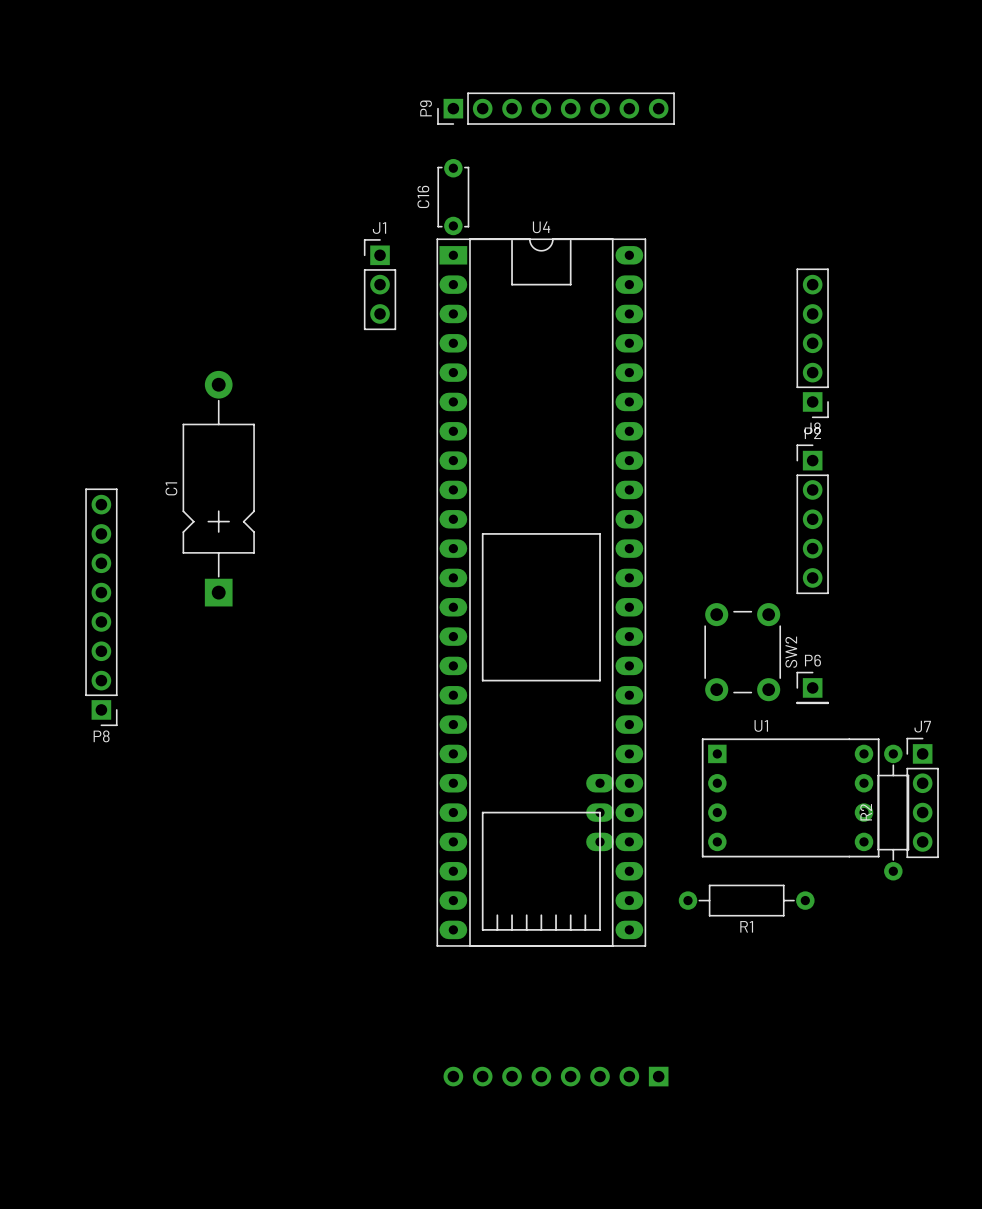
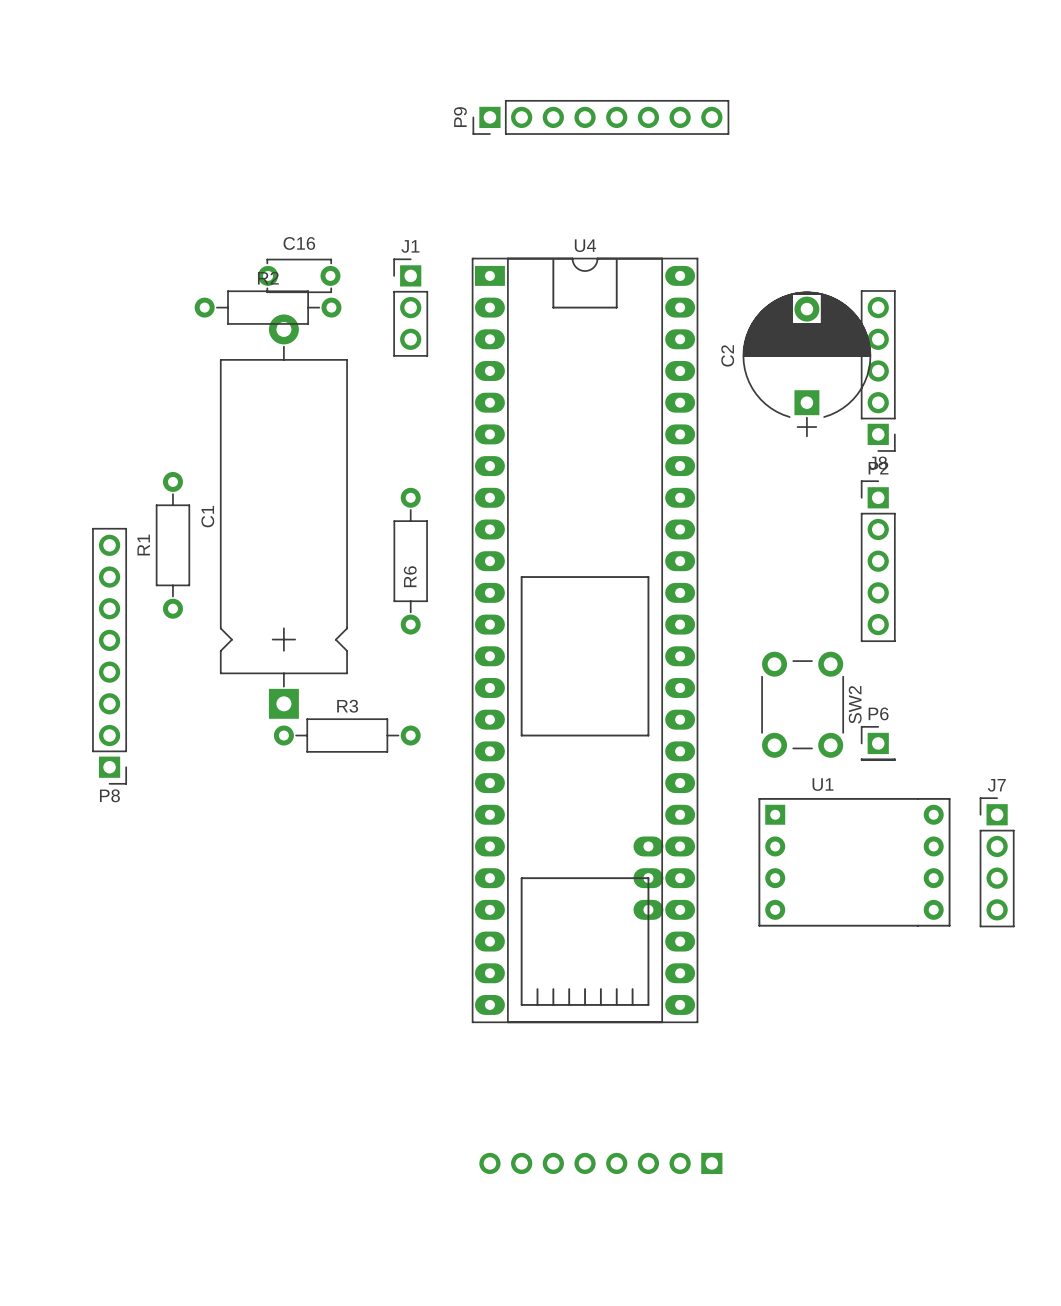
C16 rotation: 0° (453, 197) -> 90° clockwise (299, 275)
C16 position: (453, 197) -> (299, 275)
C2: none -> (806, 364)
C1 footprint: [182, 370, 255, 607] -> [220, 314, 348, 719]
R6: none -> (410, 561)
R3: none -> (347, 735)
R2 rotation: 0° (893, 812) -> 90° clockwise (268, 307)
R2 position: (893, 812) -> (268, 307)
R1 rotation: 0° (746, 900) -> 90° clockwise (172, 545)
R1 position: (746, 900) -> (172, 545)

